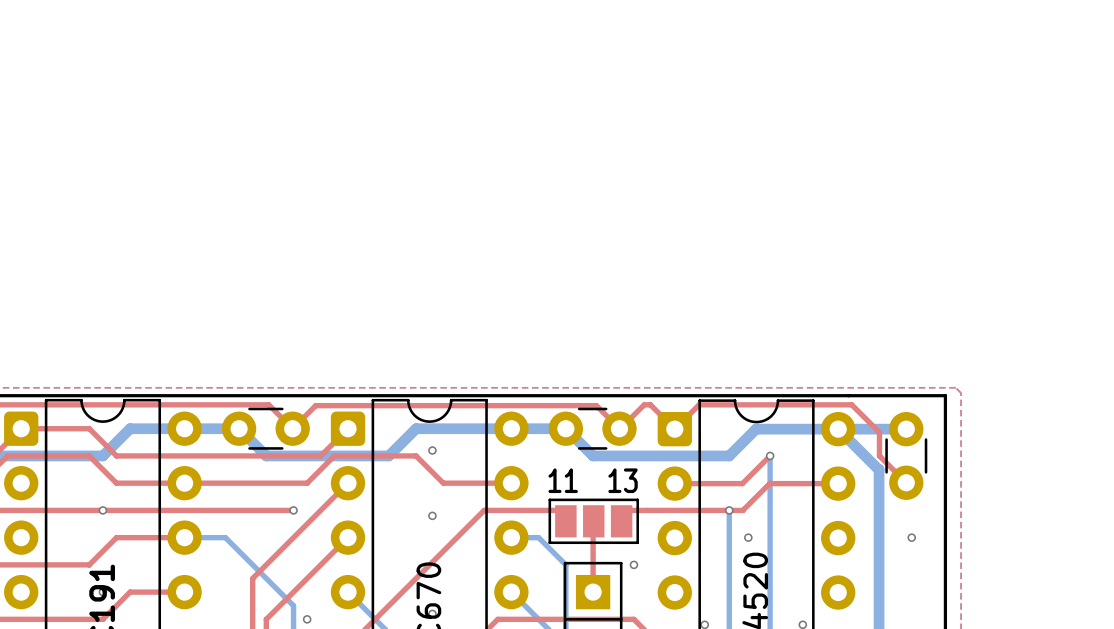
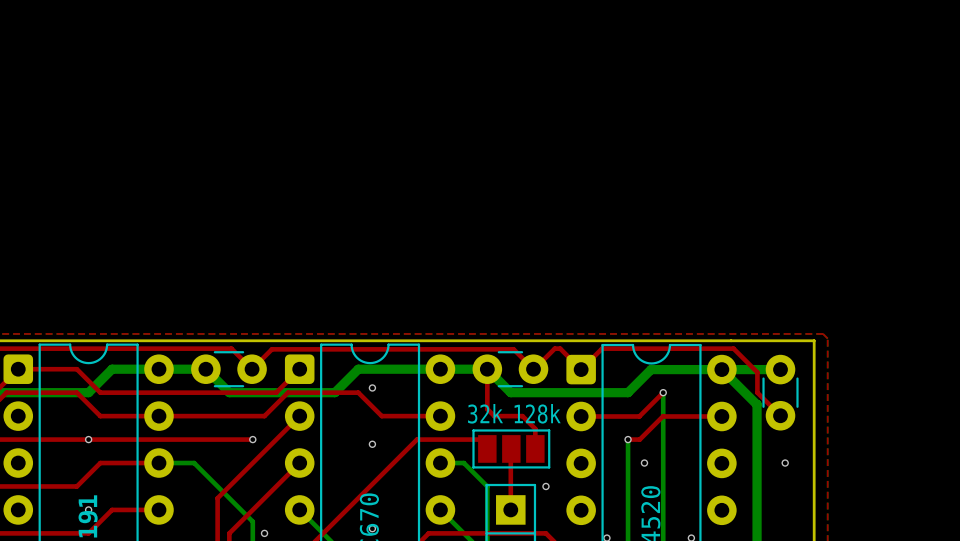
top track: none -> (487, 369) (487, 409) (494, 416) (522, 416) (535, 428) (535, 448)
text: 11 (563, 480) -> 32k (485, 413)
text: 13 (623, 480) -> 128k (537, 413)
top track: (621, 510) (729, 510) -> none

